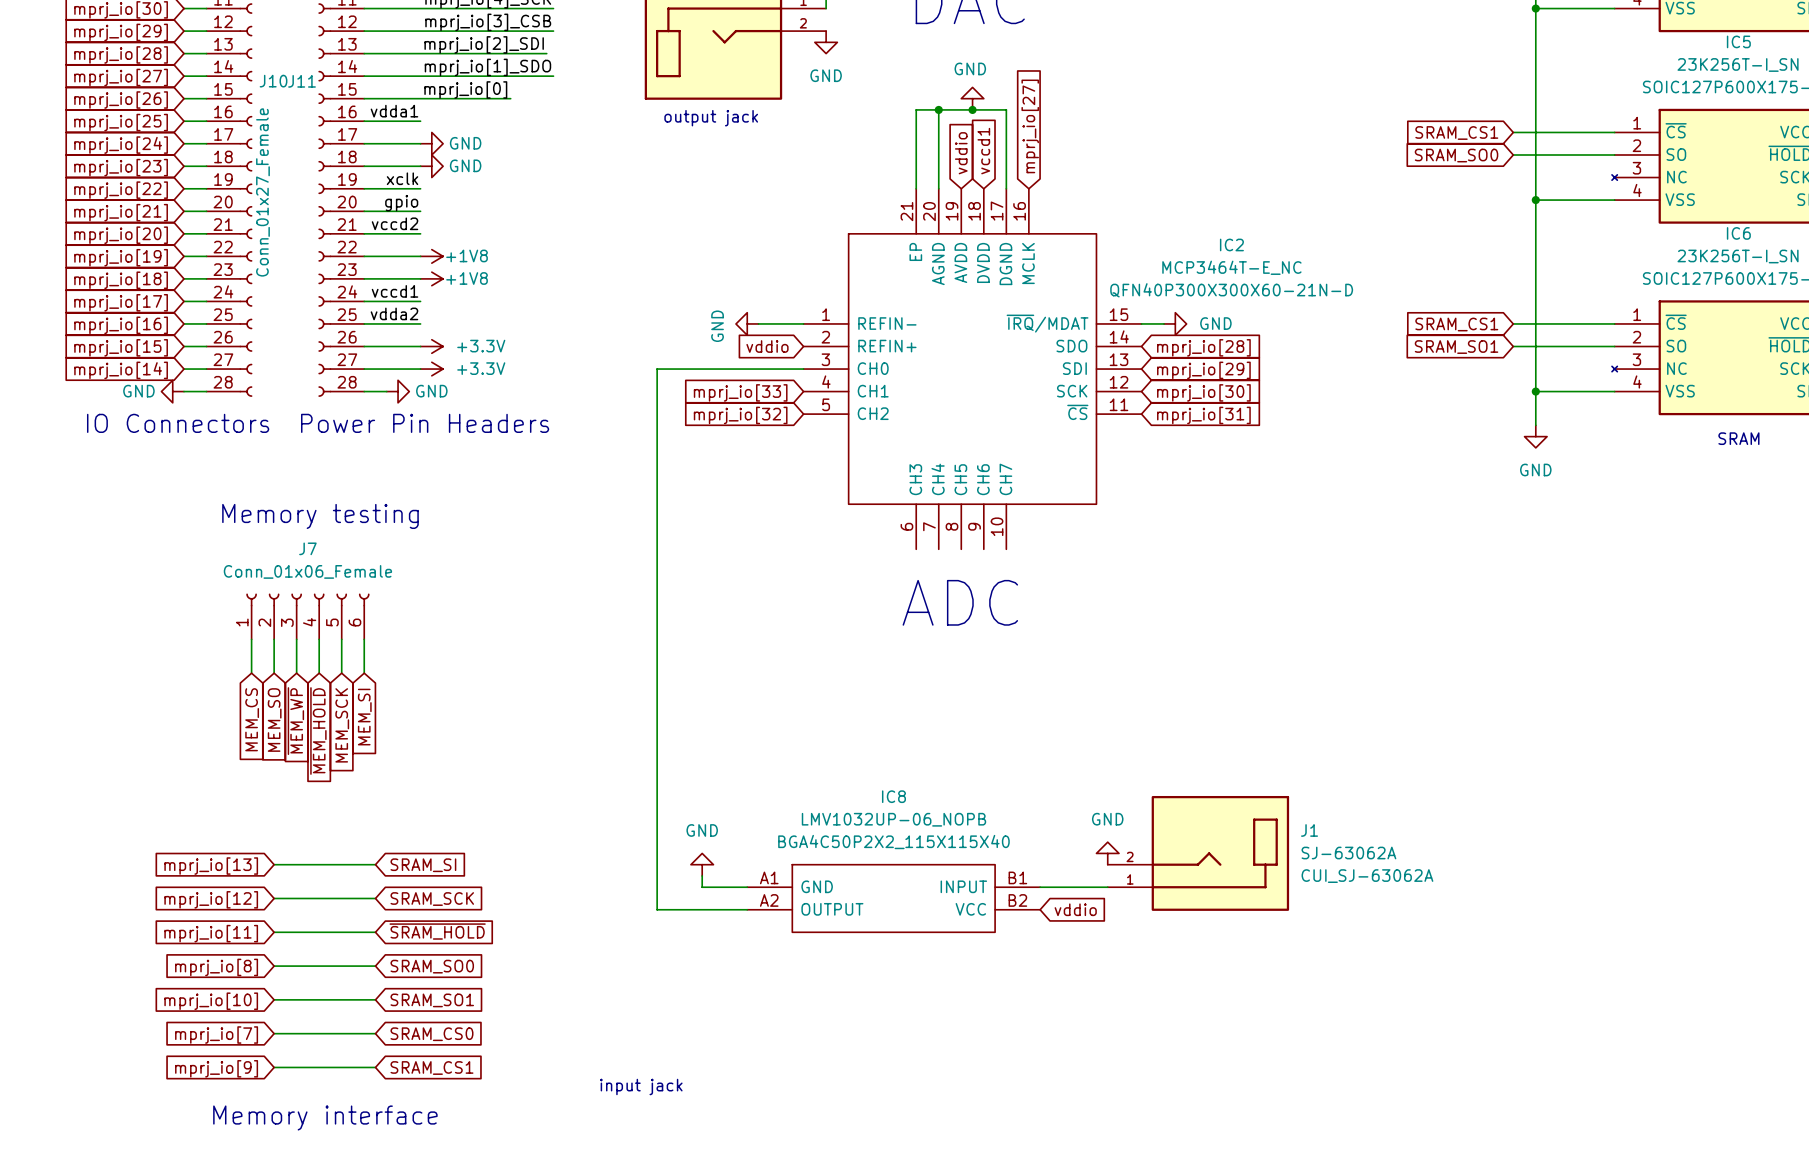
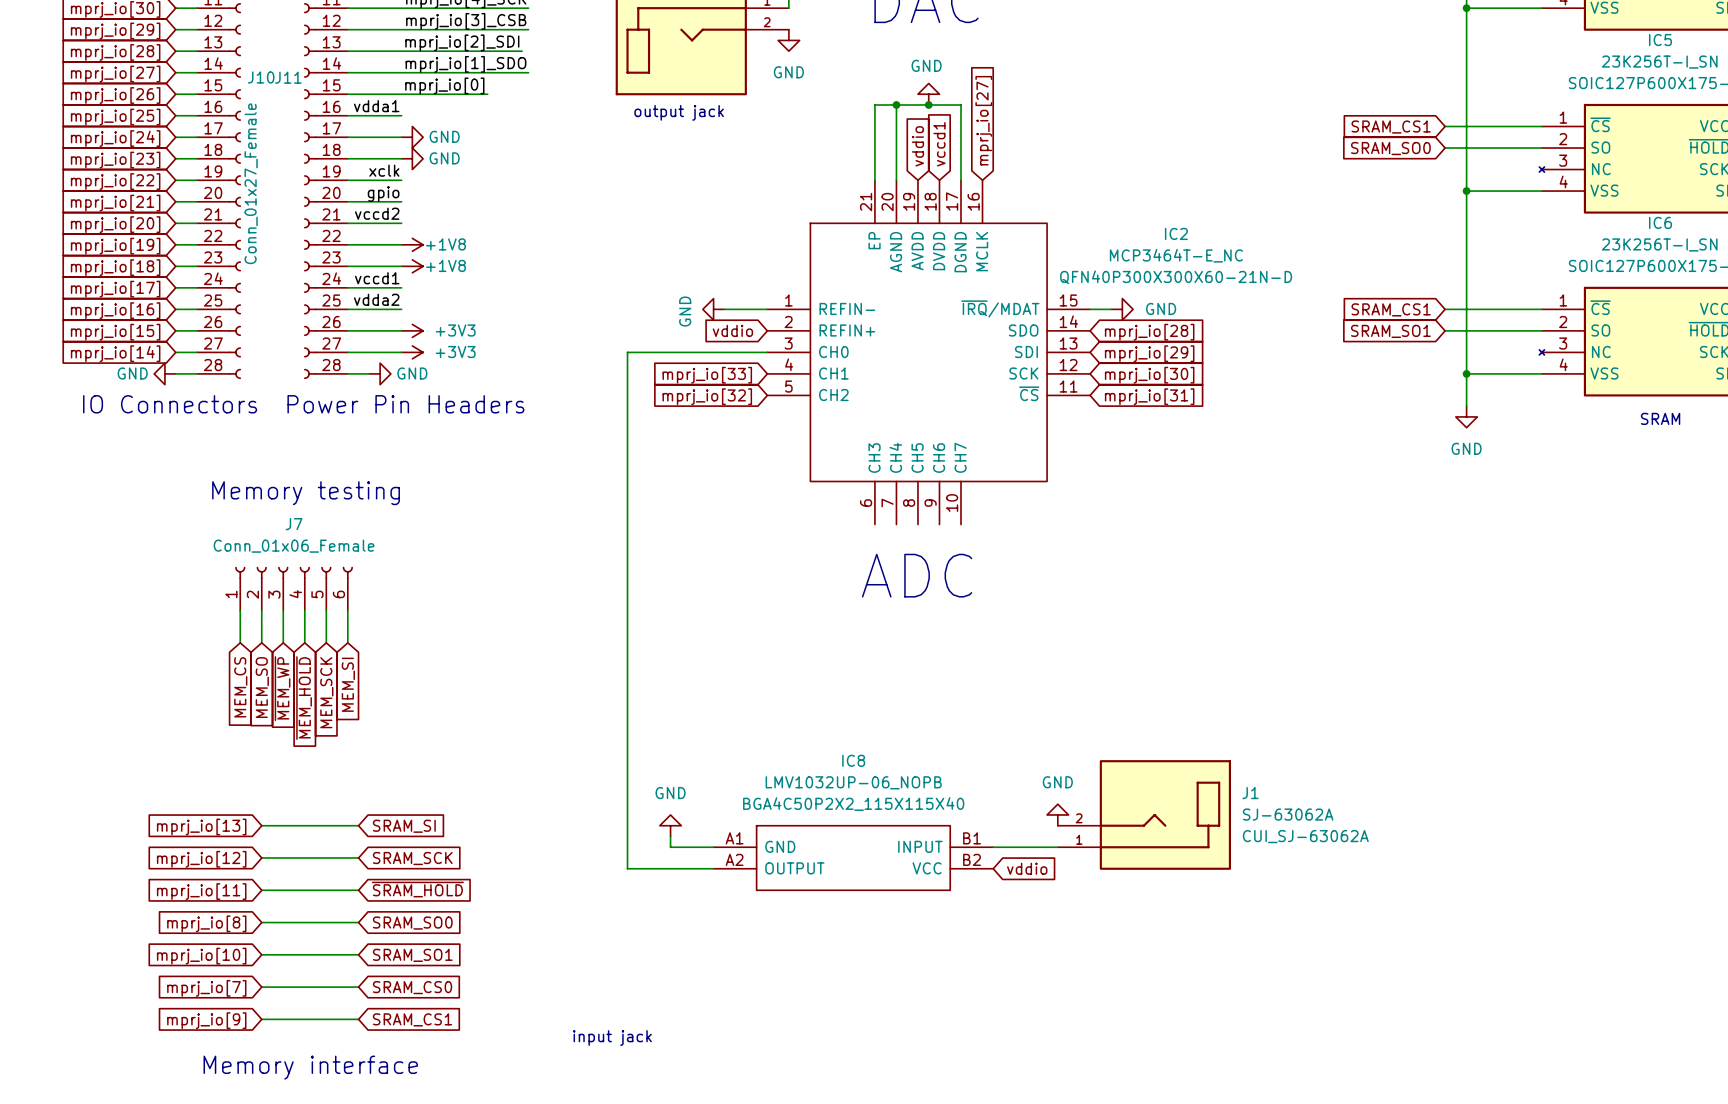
power symbol: +3.3V (431, 346) -> +3V3 (412, 330)
power symbol: +3.3V (431, 369) -> +3V3 (412, 352)

